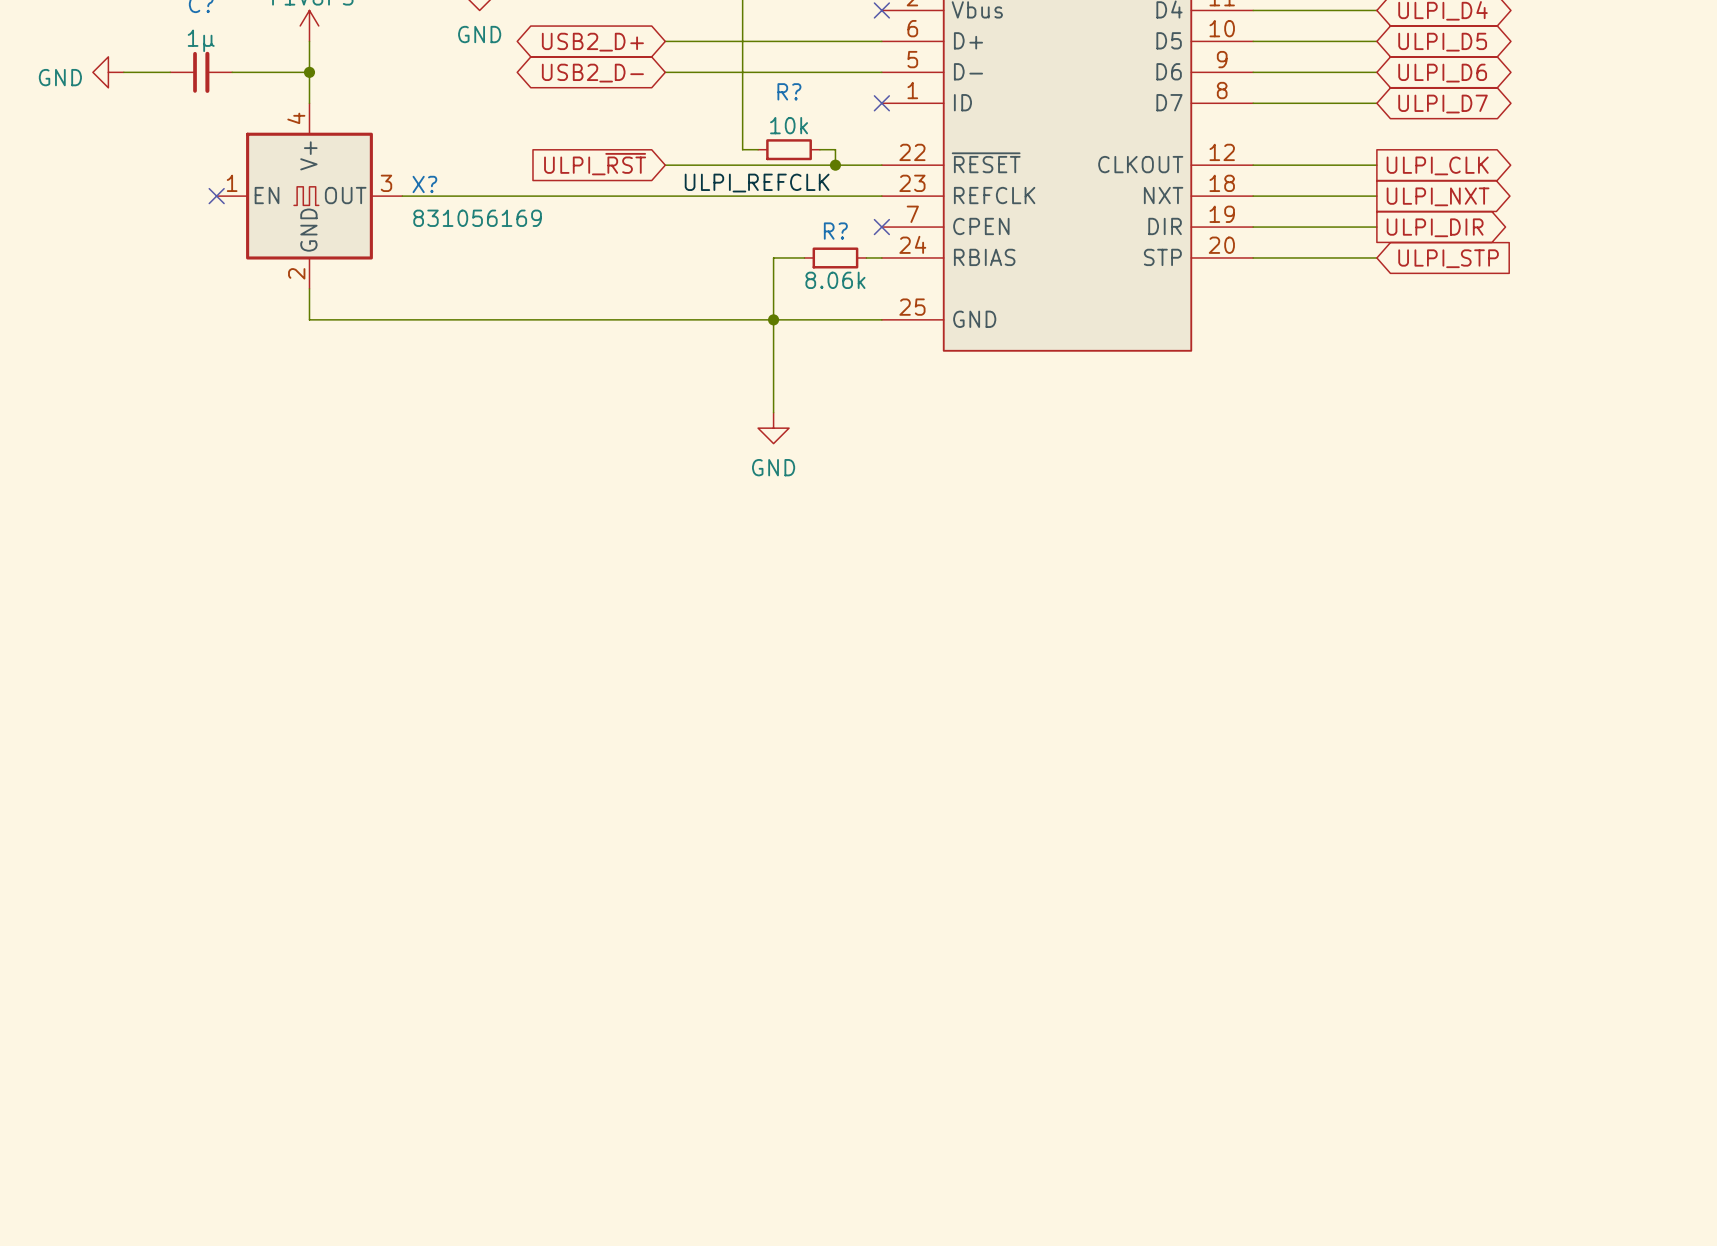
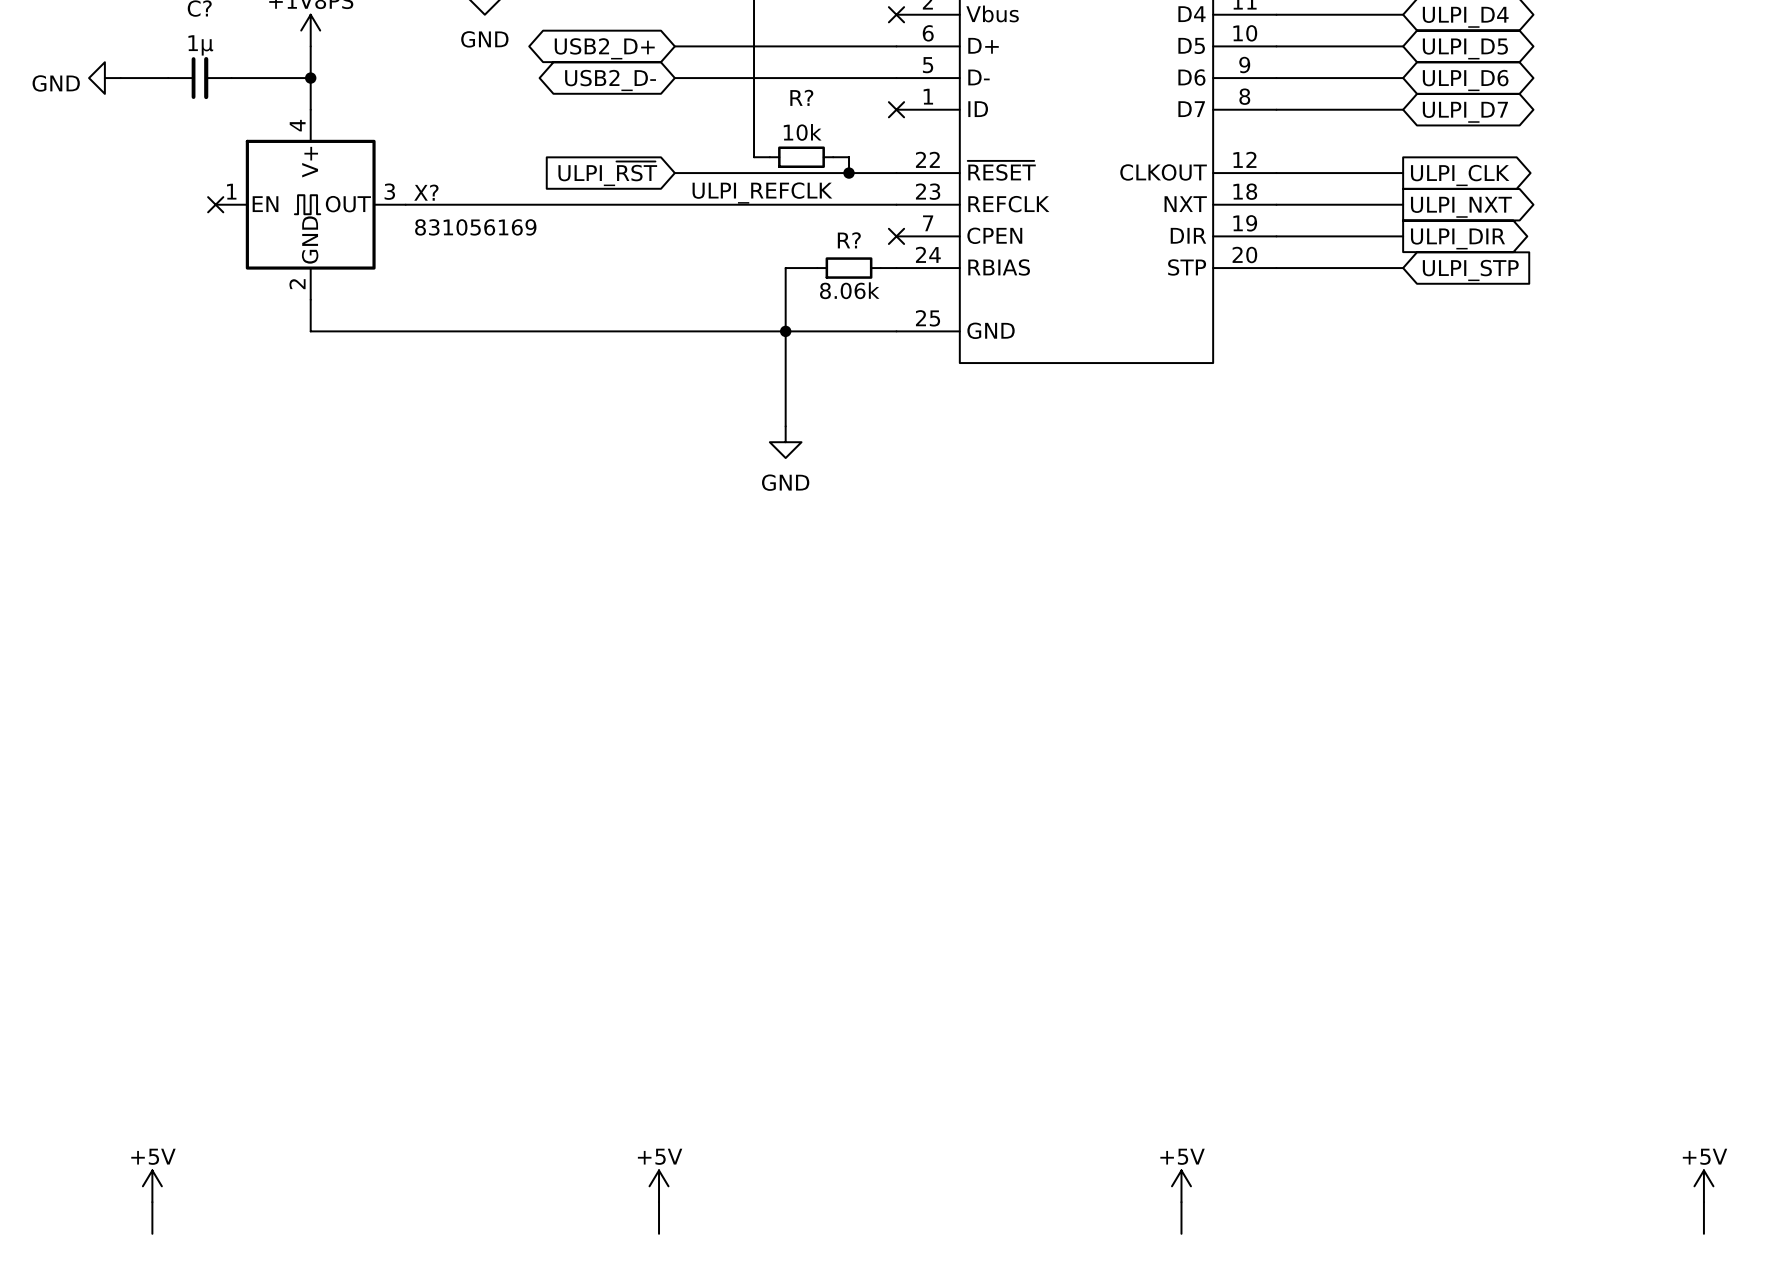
power symbol: none -> +5V (152, 1186)
power symbol: none -> +5V (659, 1186)
power symbol: none -> +5V (1181, 1186)
power symbol: none -> +5V (1703, 1186)
wire: none -> (152, 1202) (152, 1233)
wire: none -> (659, 1202) (659, 1233)
wire: none -> (1181, 1202) (1181, 1233)
wire: none -> (1703, 1202) (1703, 1233)

